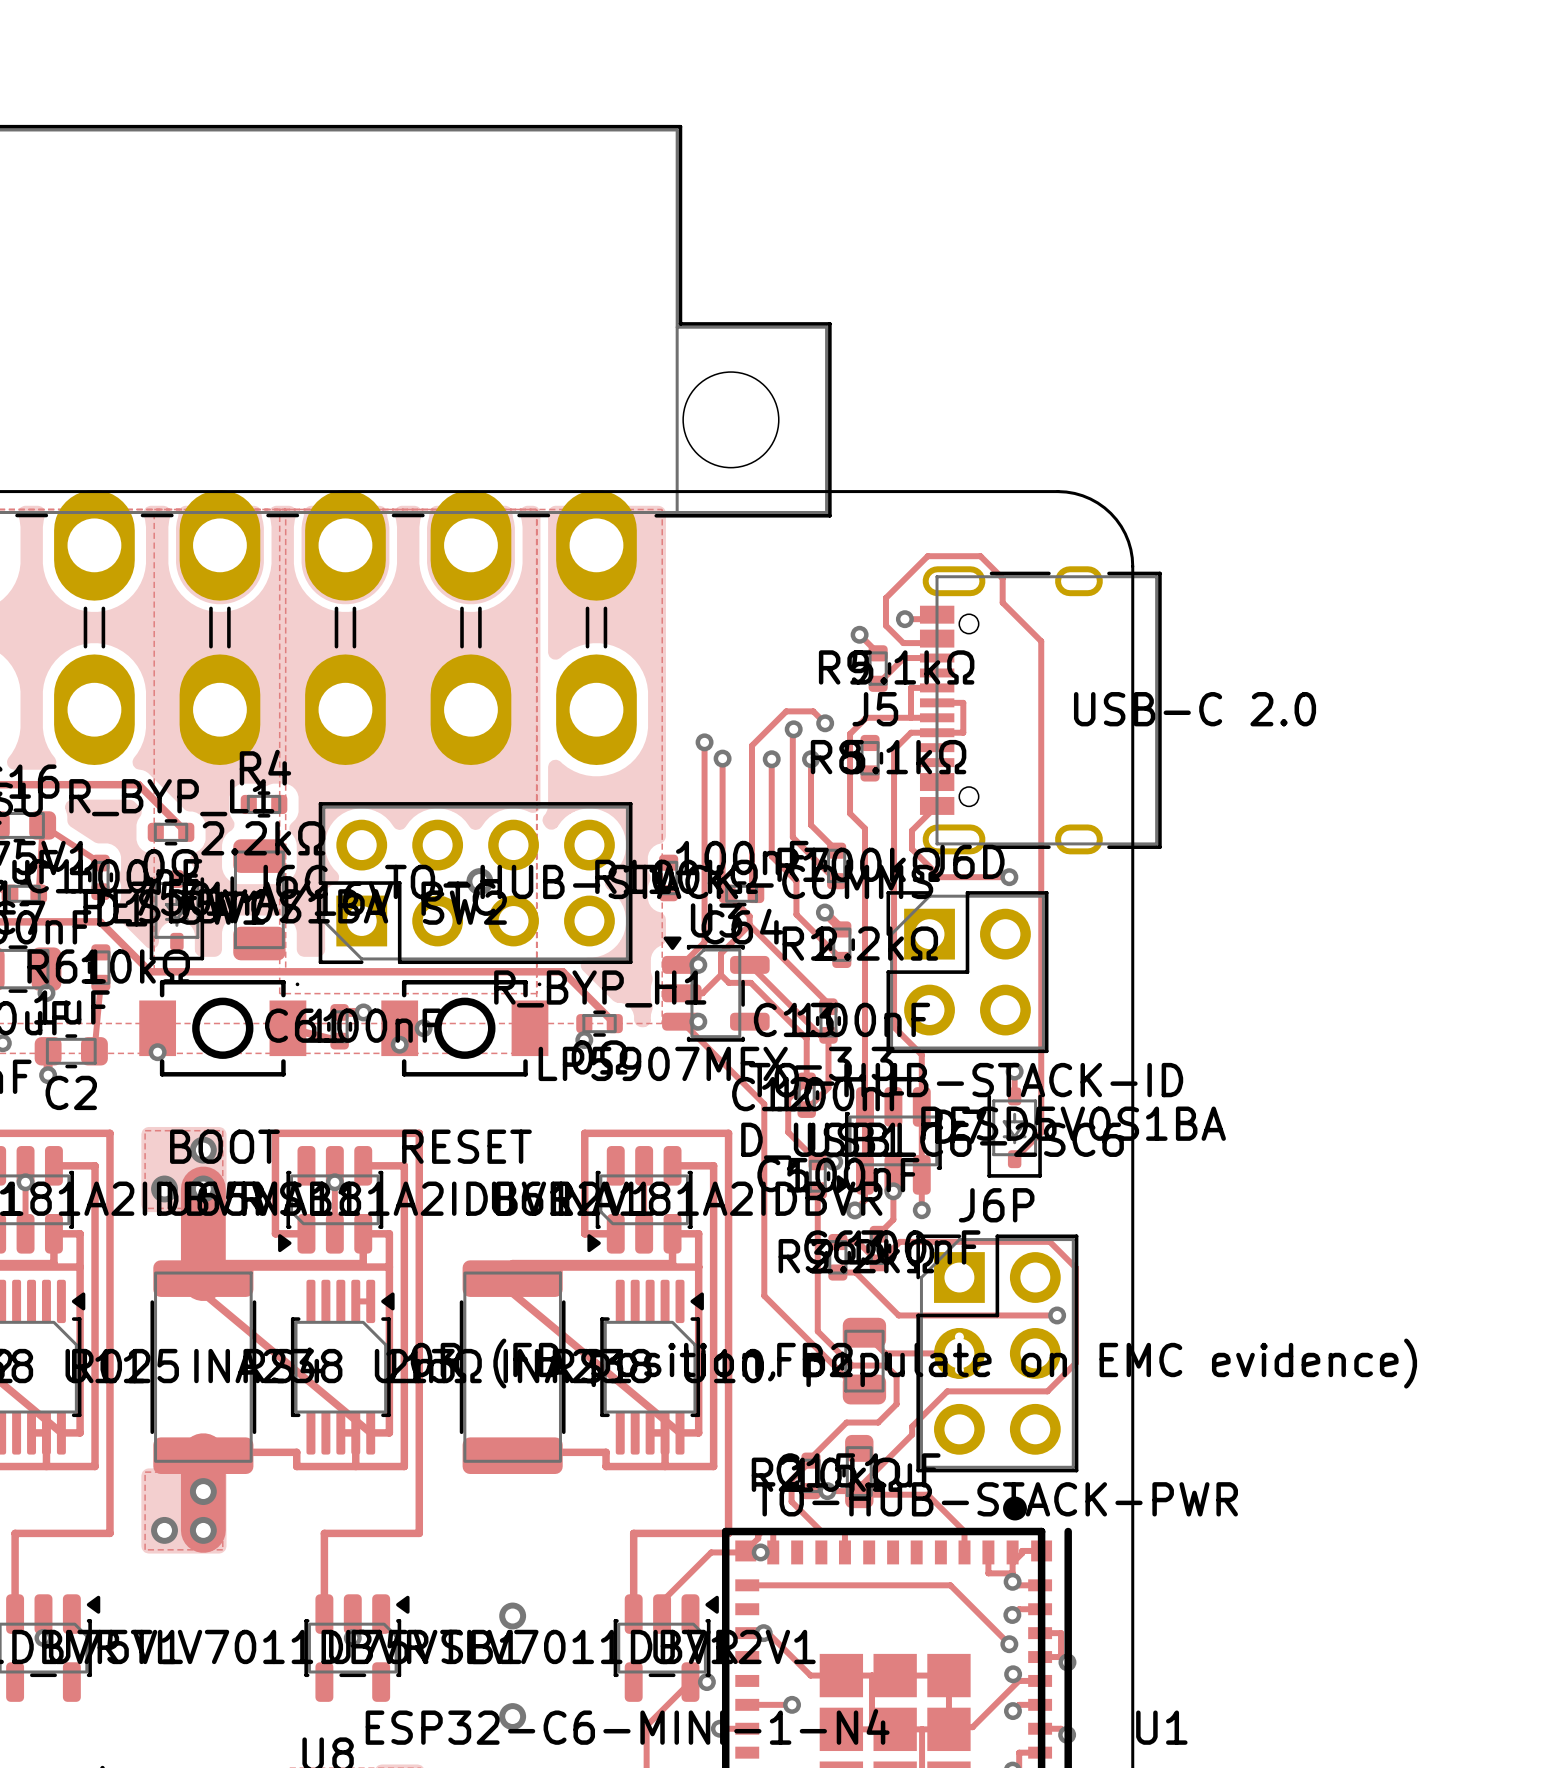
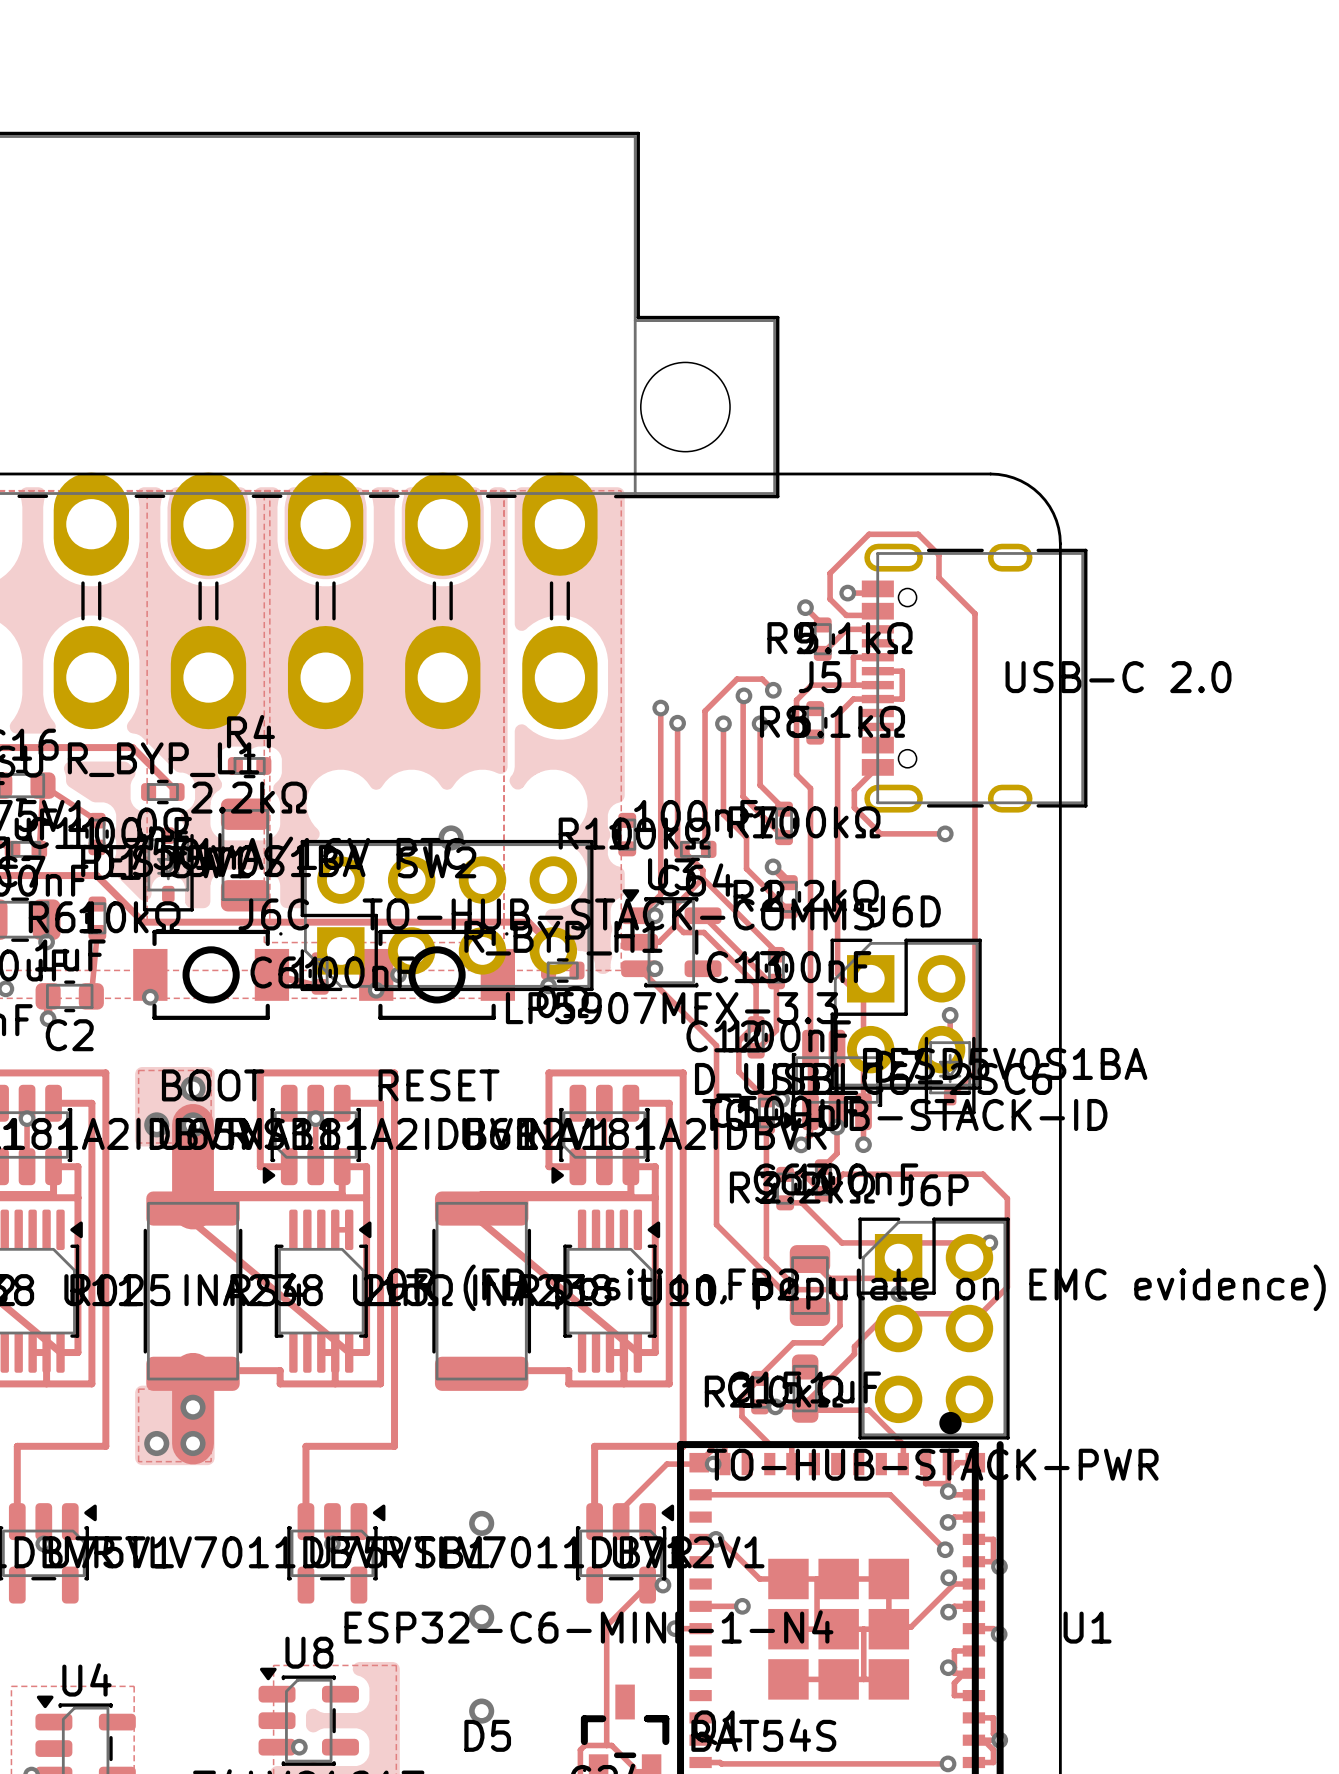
J6C position: (475, 883) -> (447, 915)
J6D position: (967, 972) -> (906, 1014)
J6P position: (997, 1353) -> (934, 1328)

